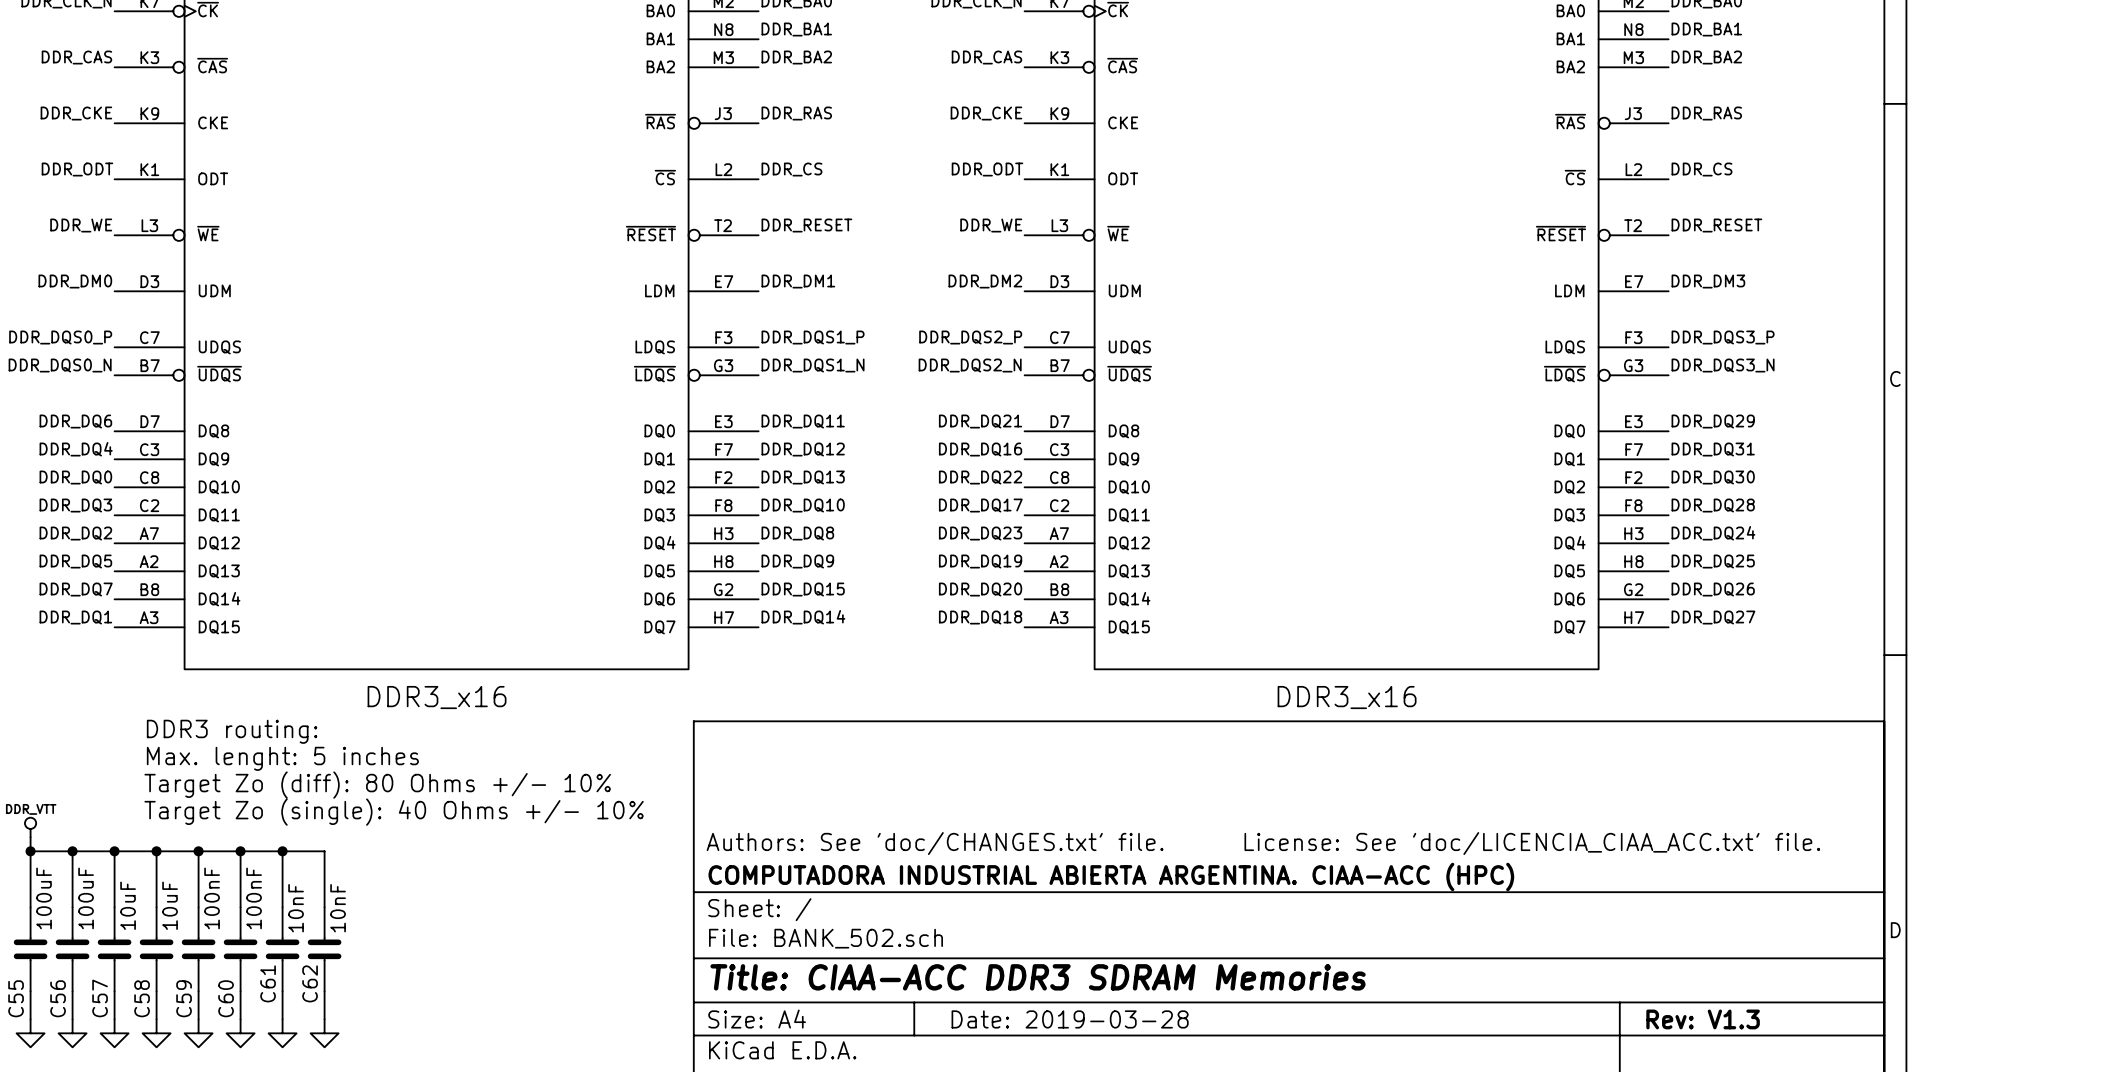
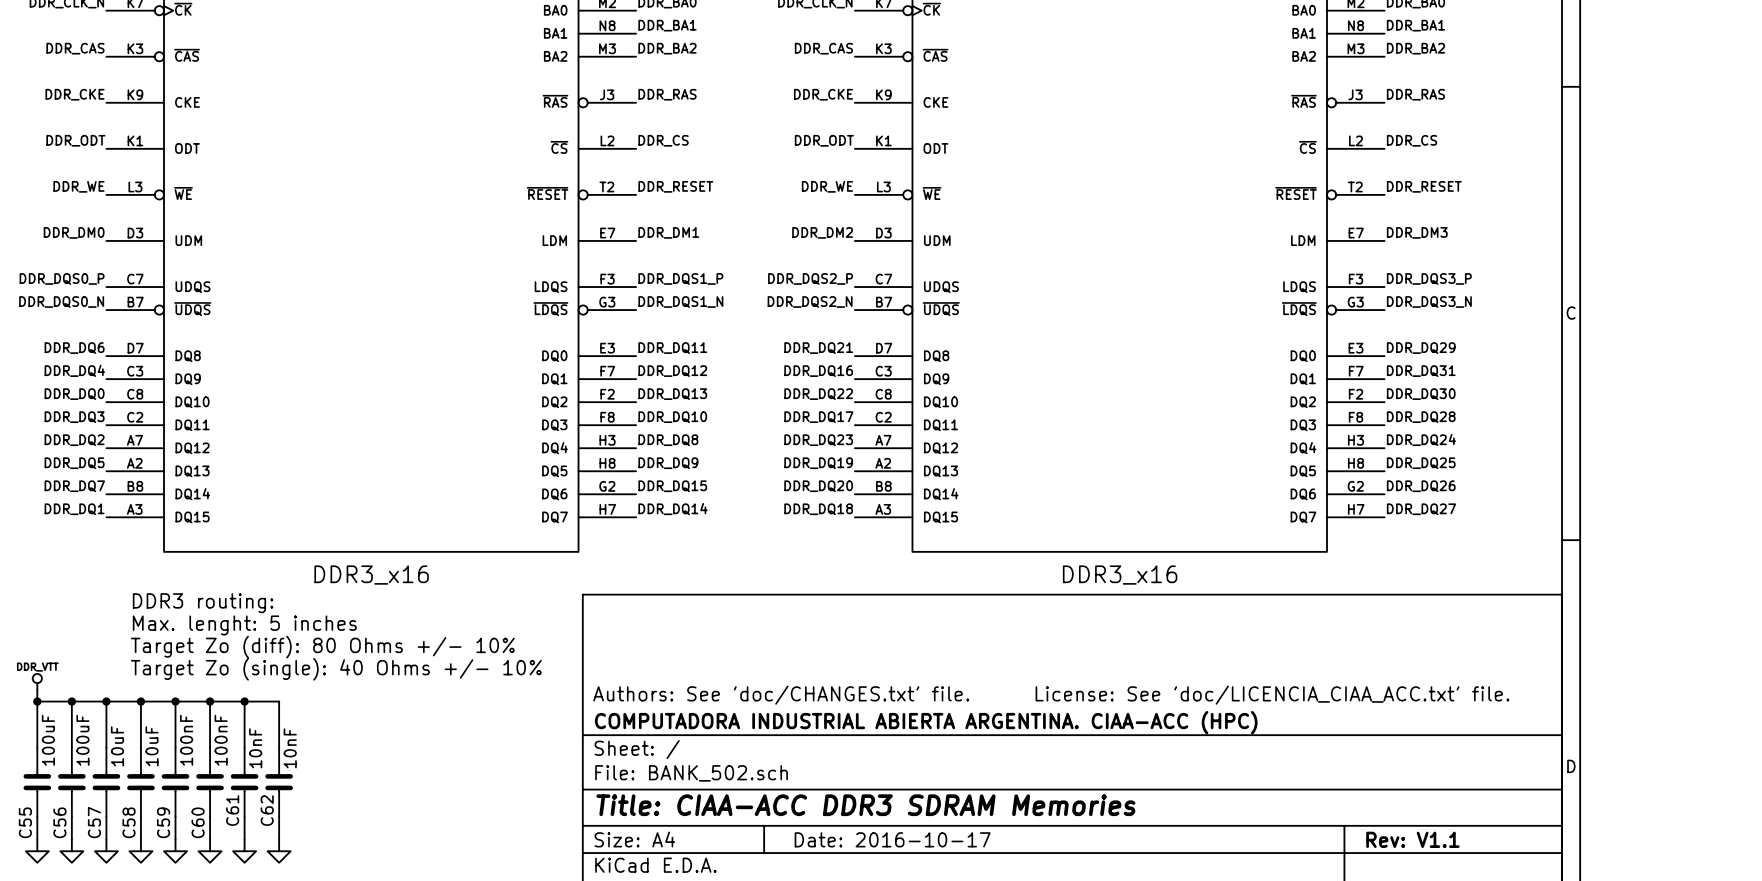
title block: Date: 2019-03-28 (1070, 1019) -> Date: 2016-10-17 (892, 839)
title block: Rev: V1.3 (1703, 1019) -> Rev: V1.1 (1412, 839)

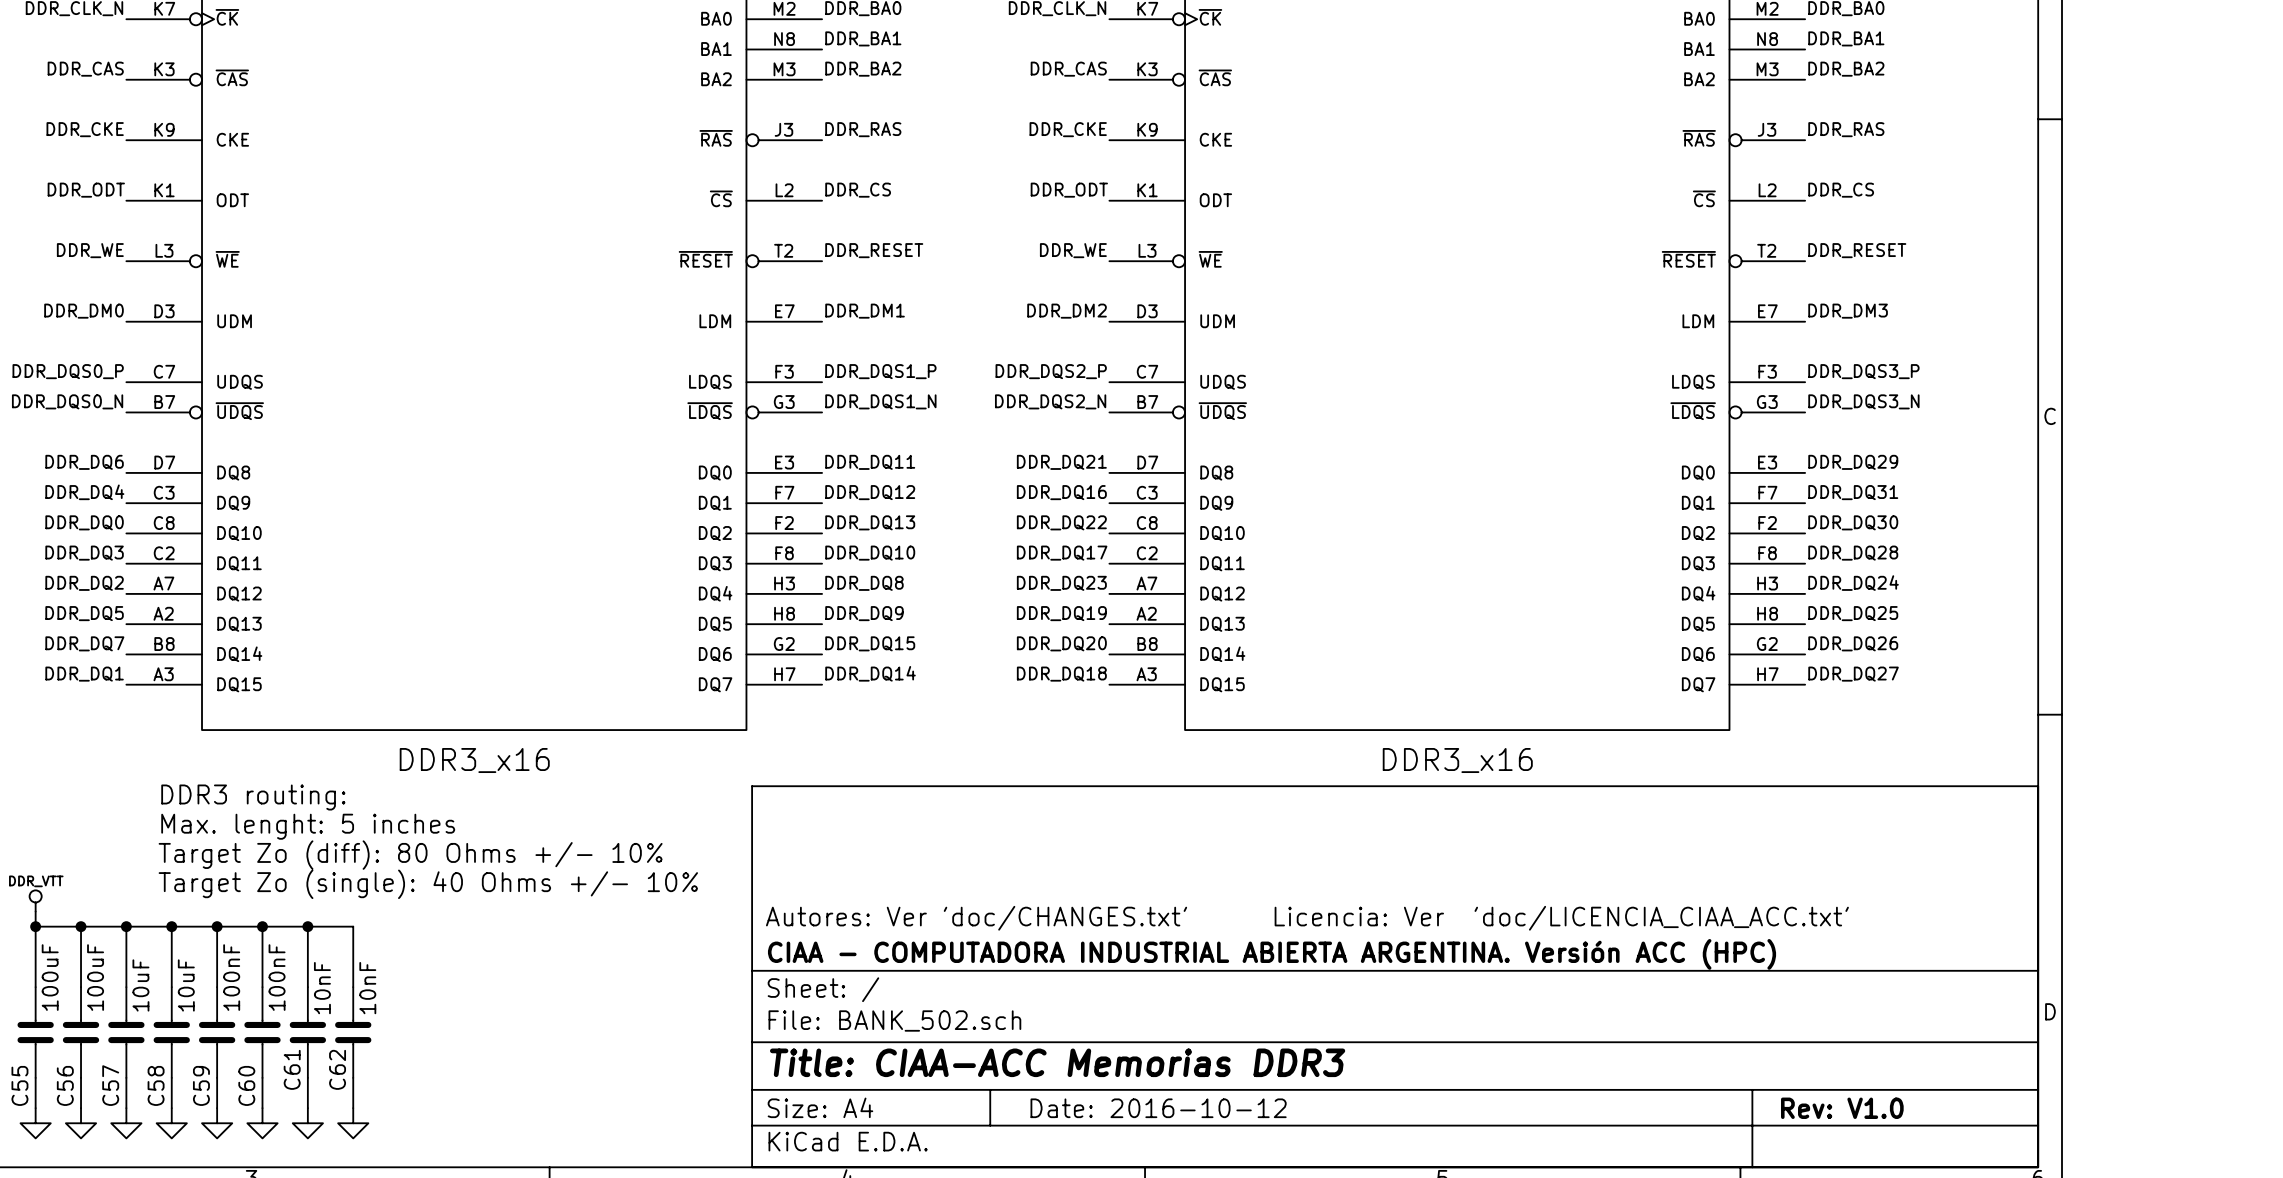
title block: Authors: See 'doc/CHANGES.txt' file. License: See 'doc/LICENCIA_CIAA_ACC.txt' file. (1051, 695) -> Autores: Ver 'doc/CHANGES.txt' Licencia: Ver 'doc/LICENCIA_CIAA_ACC.txt' (1307, 918)
title block: COMPUTADORA INDUSTRIAL ABIERTA ARGENTINA. CIAA-ACC (HPC) (926, 722) -> CIAA - COMPUTADORA INDUSTRIAL ABIERTA ARGENTINA. Versión ACC (HPC) (1272, 954)
title block: Title: CIAA-ACC DDR3 SDRAM Memories (865, 805) -> Title: CIAA-ACC Memorias DDR3 (1057, 1062)
title block: Date: 2016-10-17 (892, 839) -> Date: 2016-10-12 (1158, 1108)
title block: Rev: V1.1 (1412, 839) -> Rev: V1.0 (1842, 1108)

